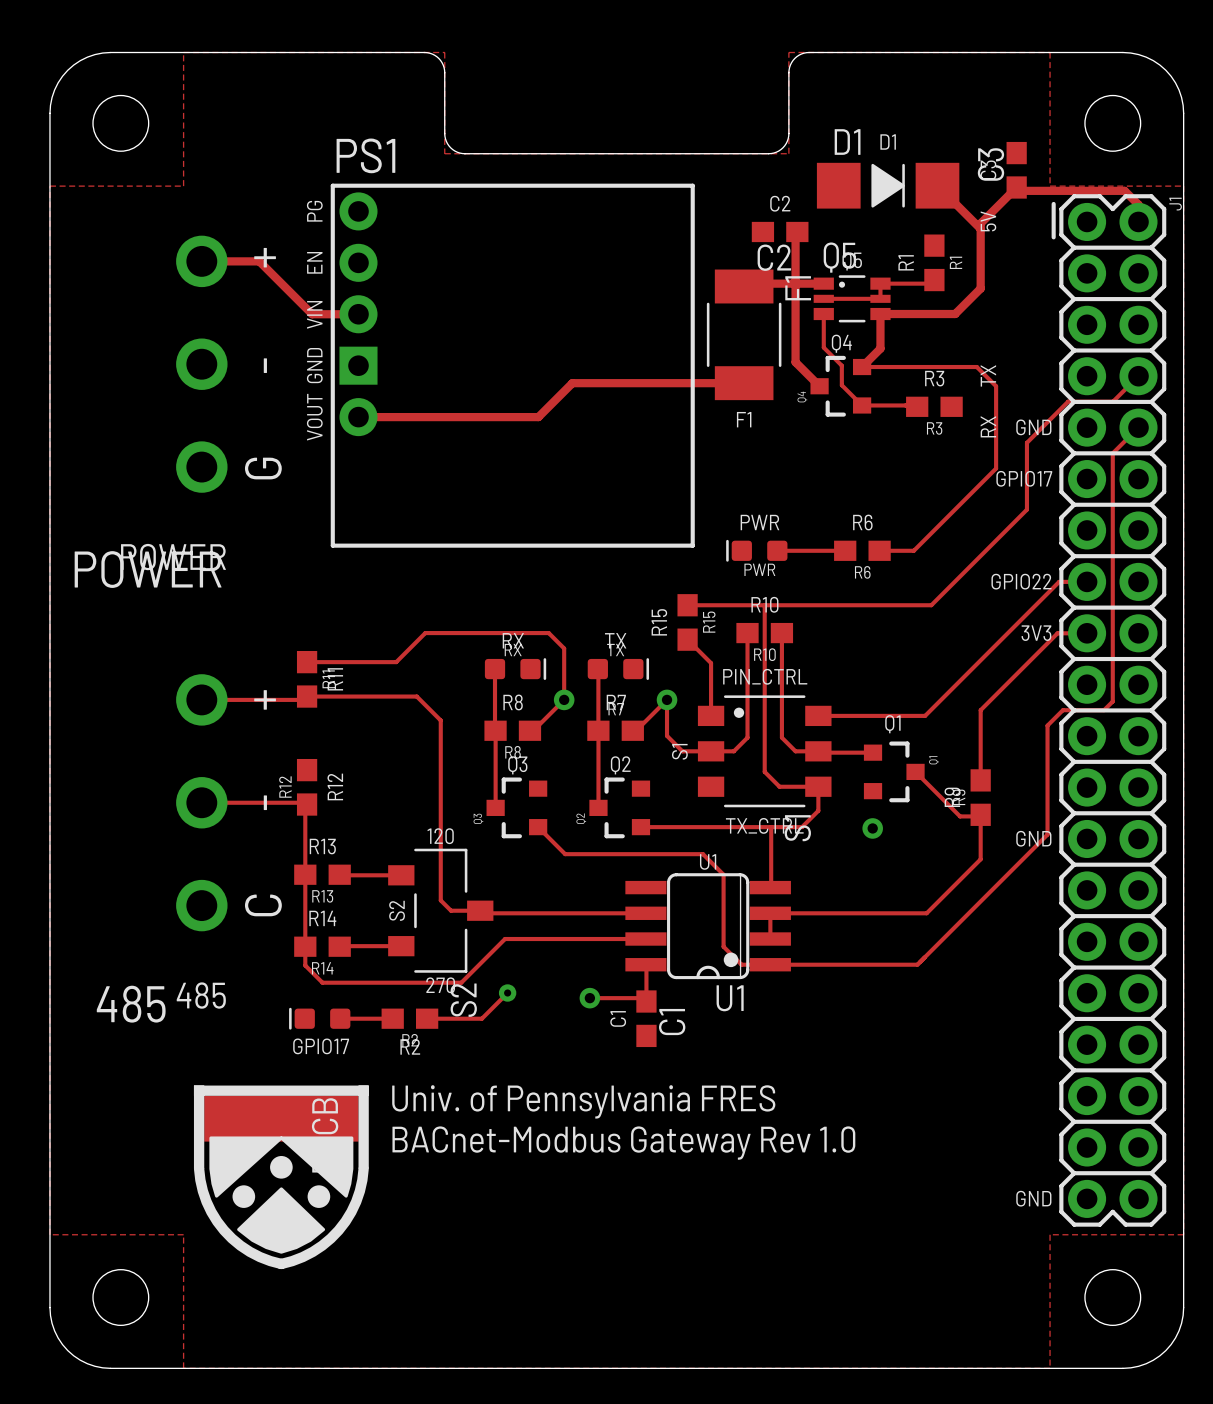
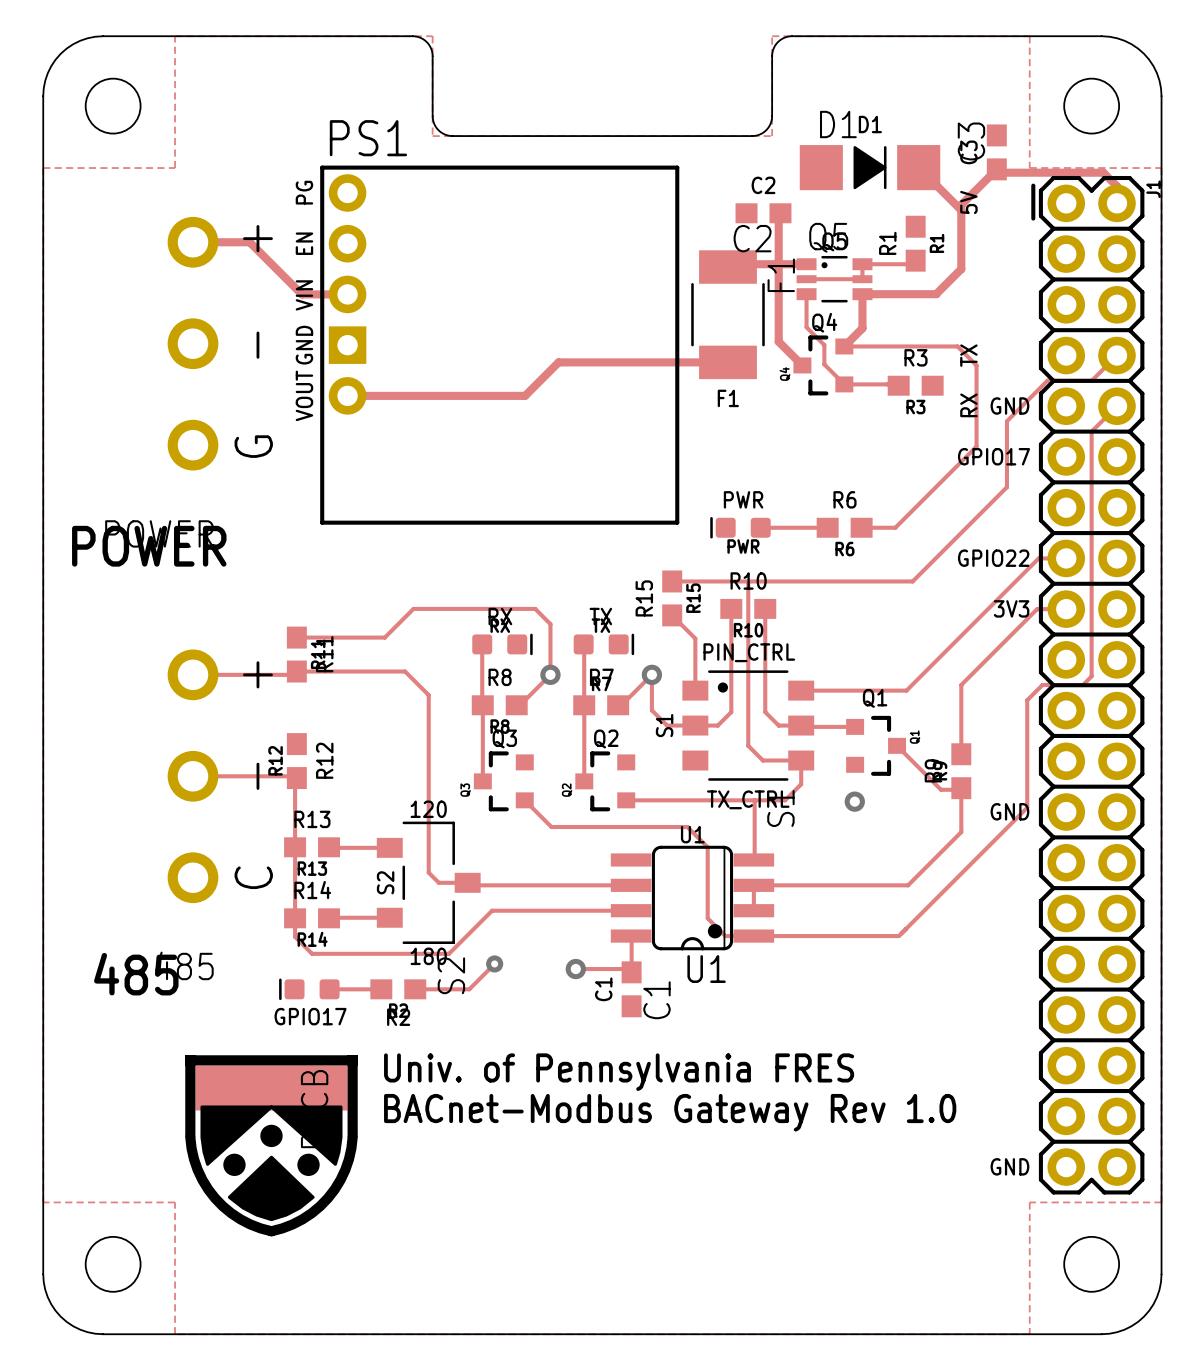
text: 270 (440, 985) -> 180 (428, 956)

